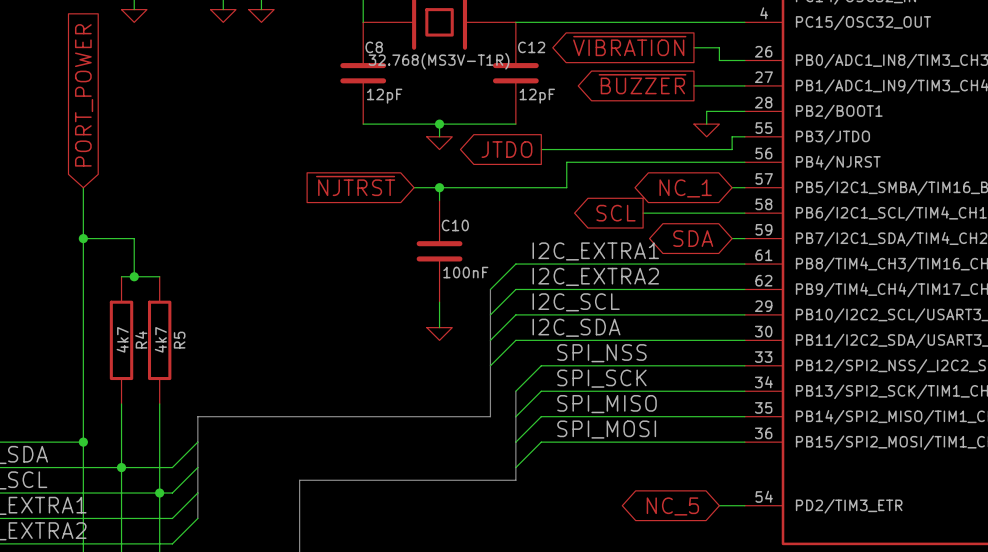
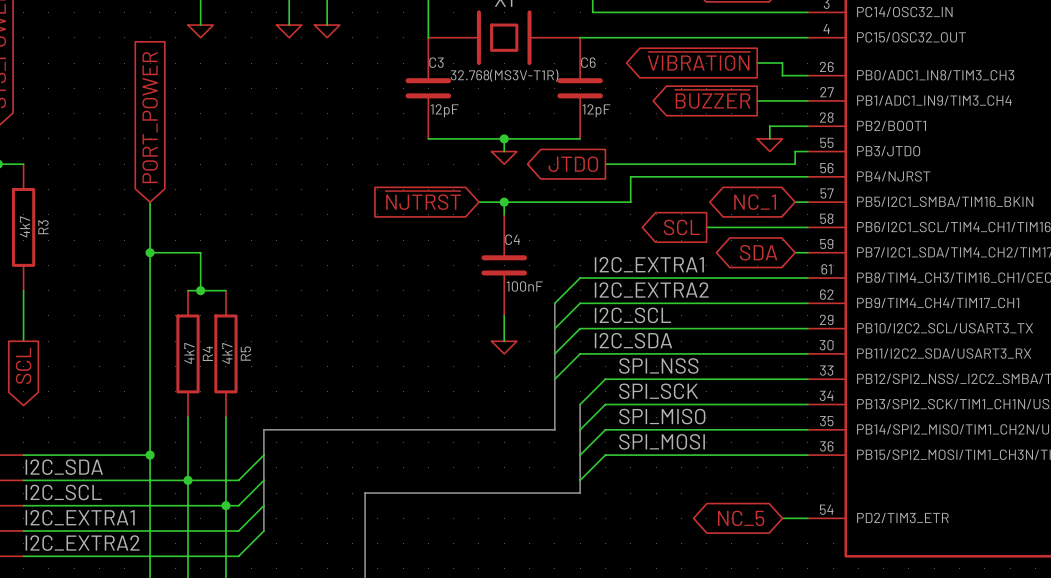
C8 name: C8 (374, 47) -> C3 (436, 62)
C12 name: C12 (531, 47) -> C6 (588, 62)
C10 name: C10 (455, 225) -> C4 (512, 239)

